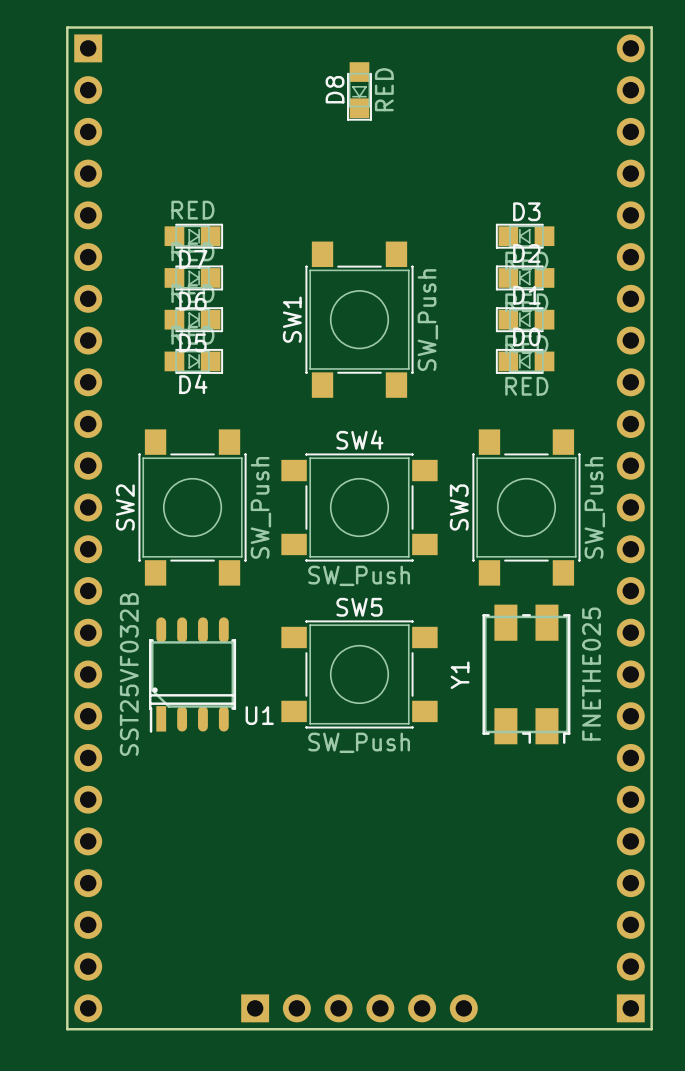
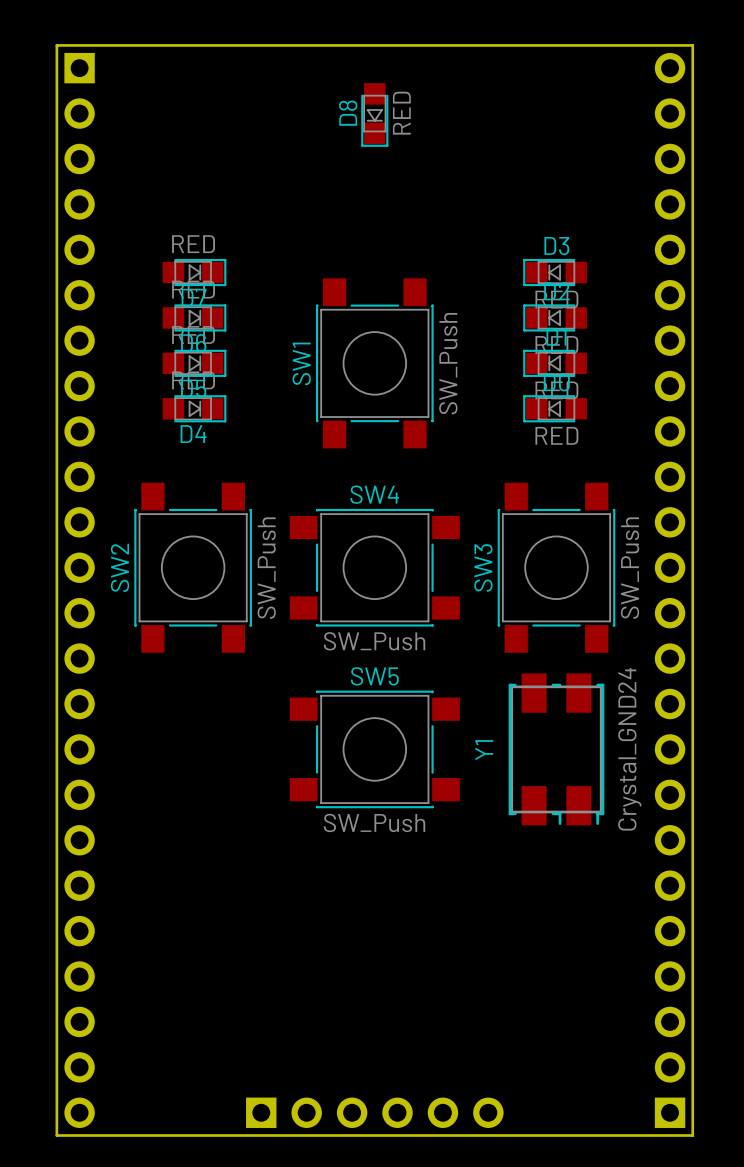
Y1 value: FNETHE025 (591, 674) -> Crystal_GND24 (629, 749)
U1: SST25VF032B (192, 675) -> none

